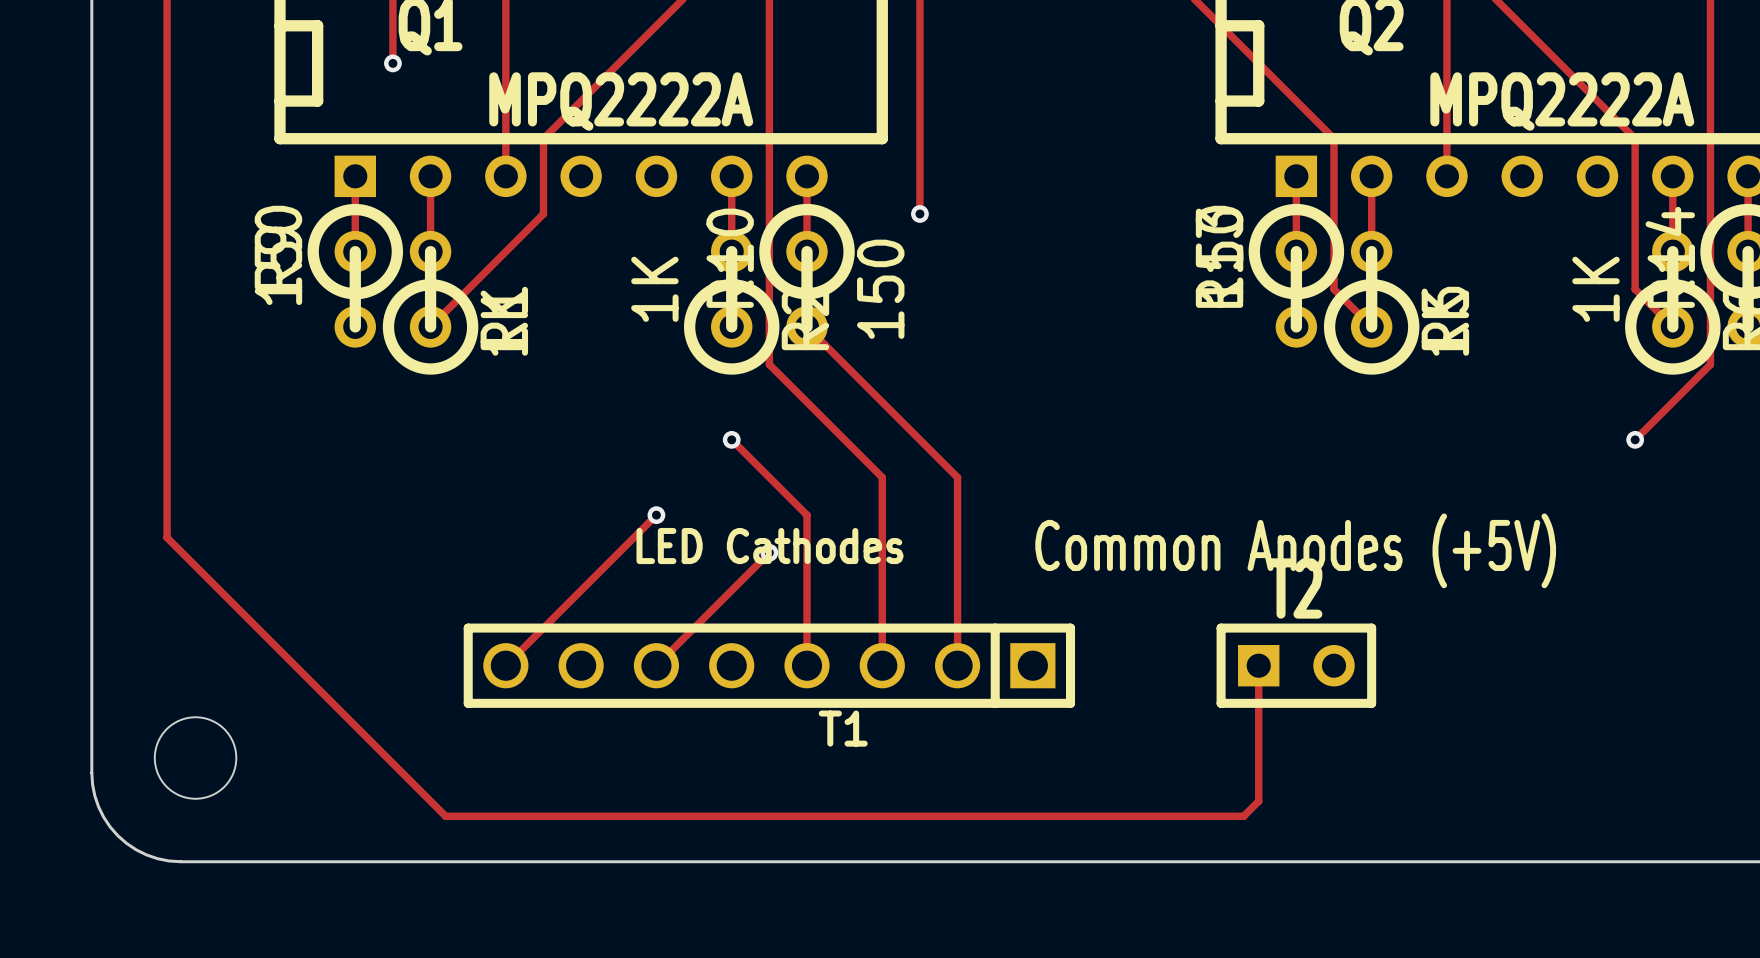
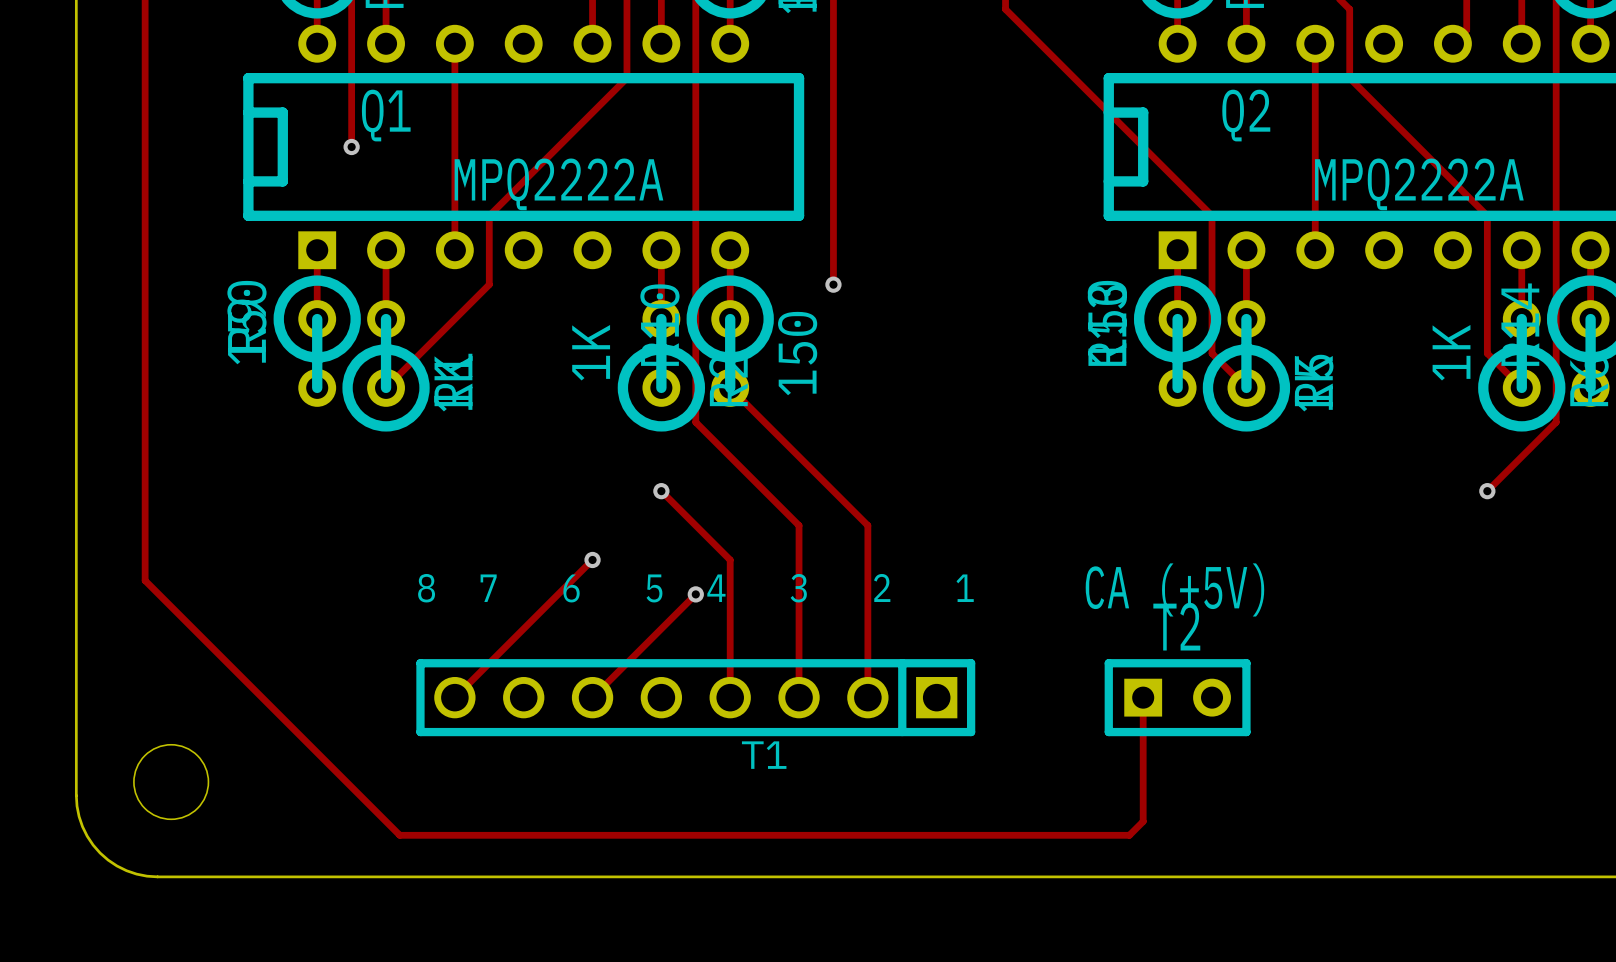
T1 value: LED Cathodes (769, 546) -> 8 7 6 5 4 3 2 1 (695, 588)
T2 value: Common Anodes (+5V) (1295, 550) -> CA (+5V) (1174, 589)

